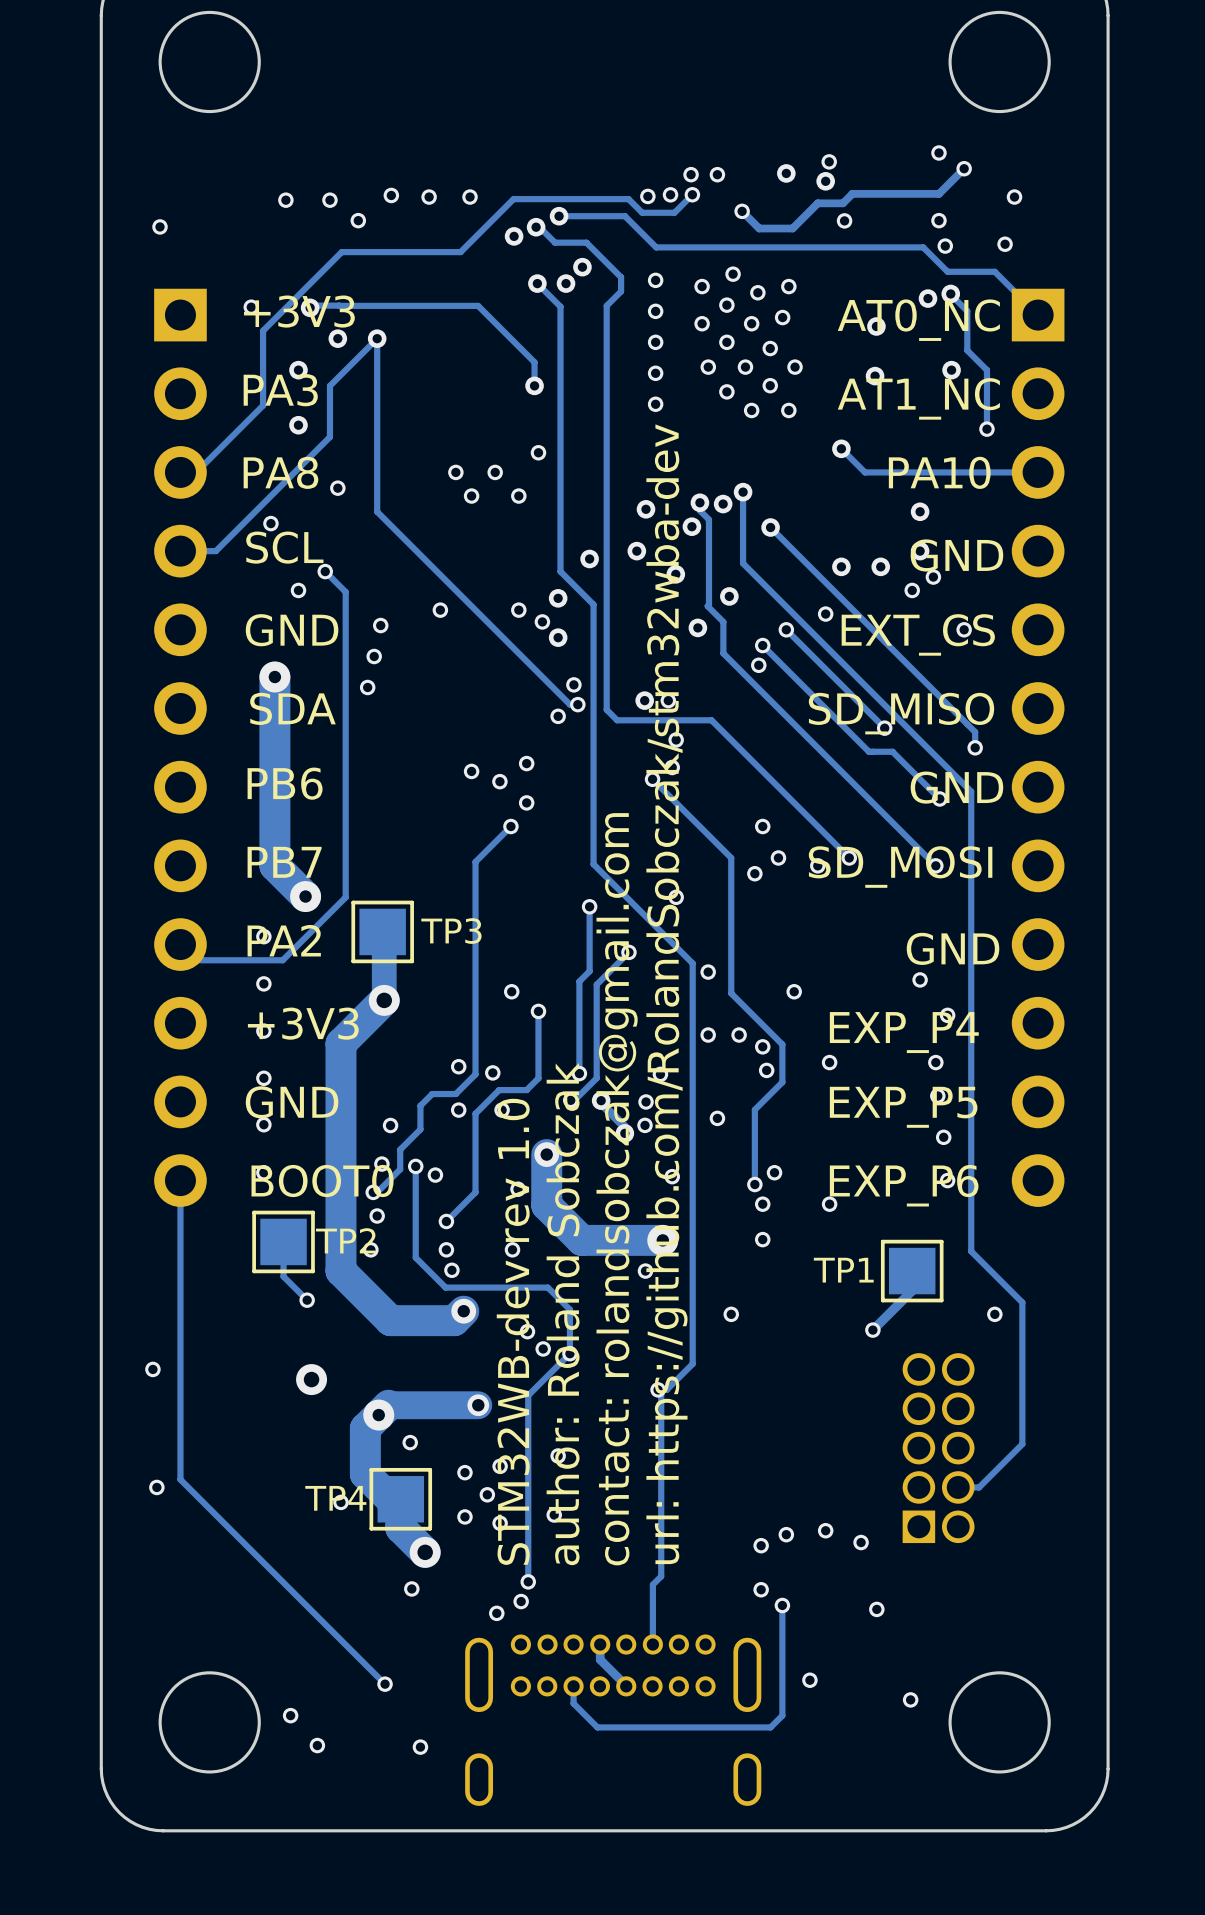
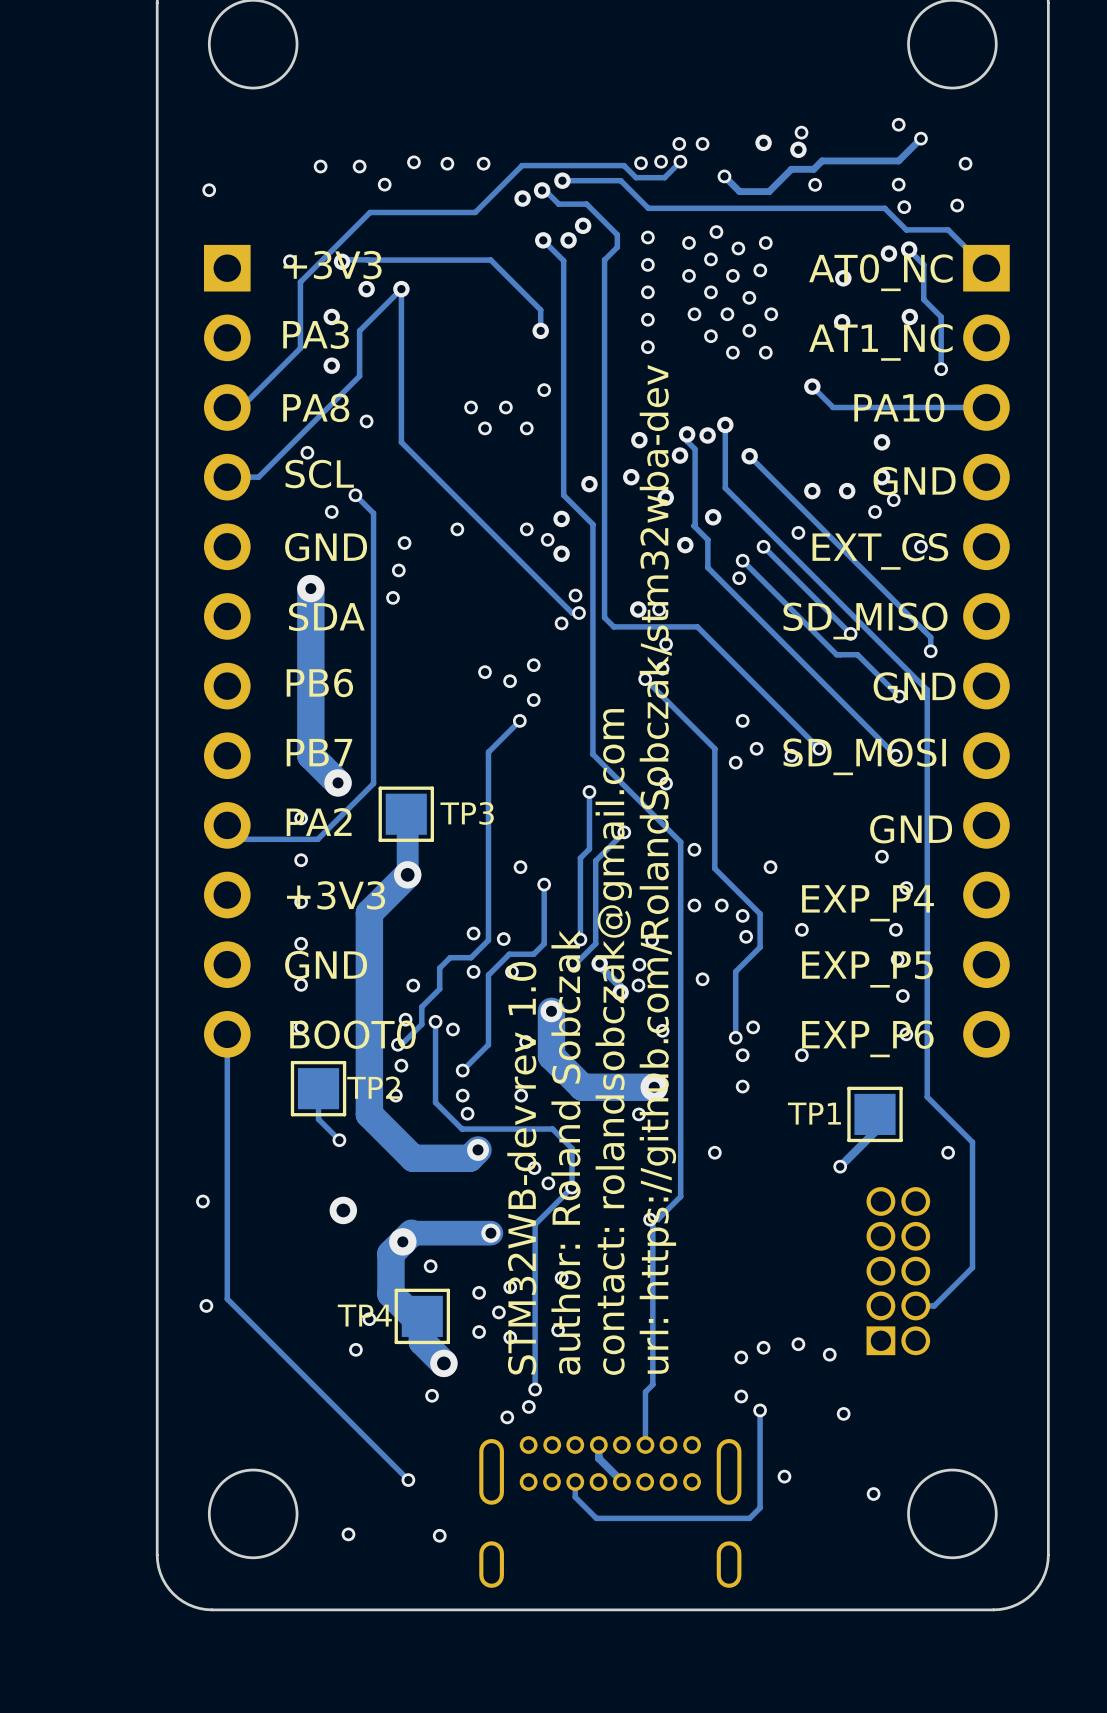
via position: (290, 1715) -> (355, 1349)

